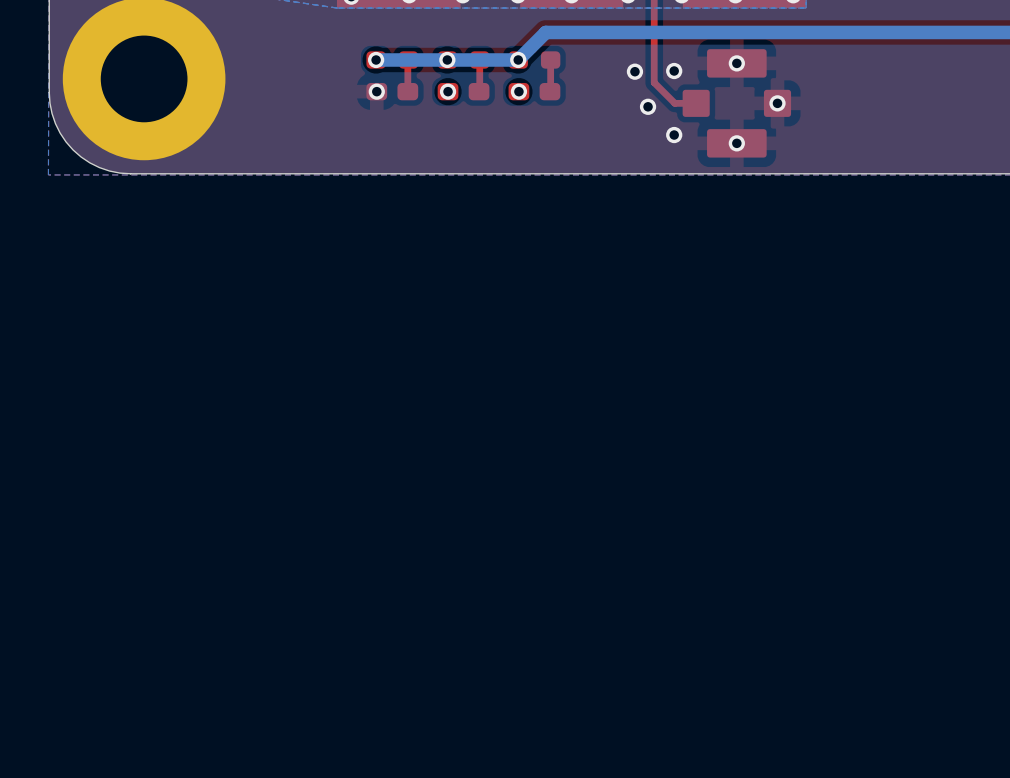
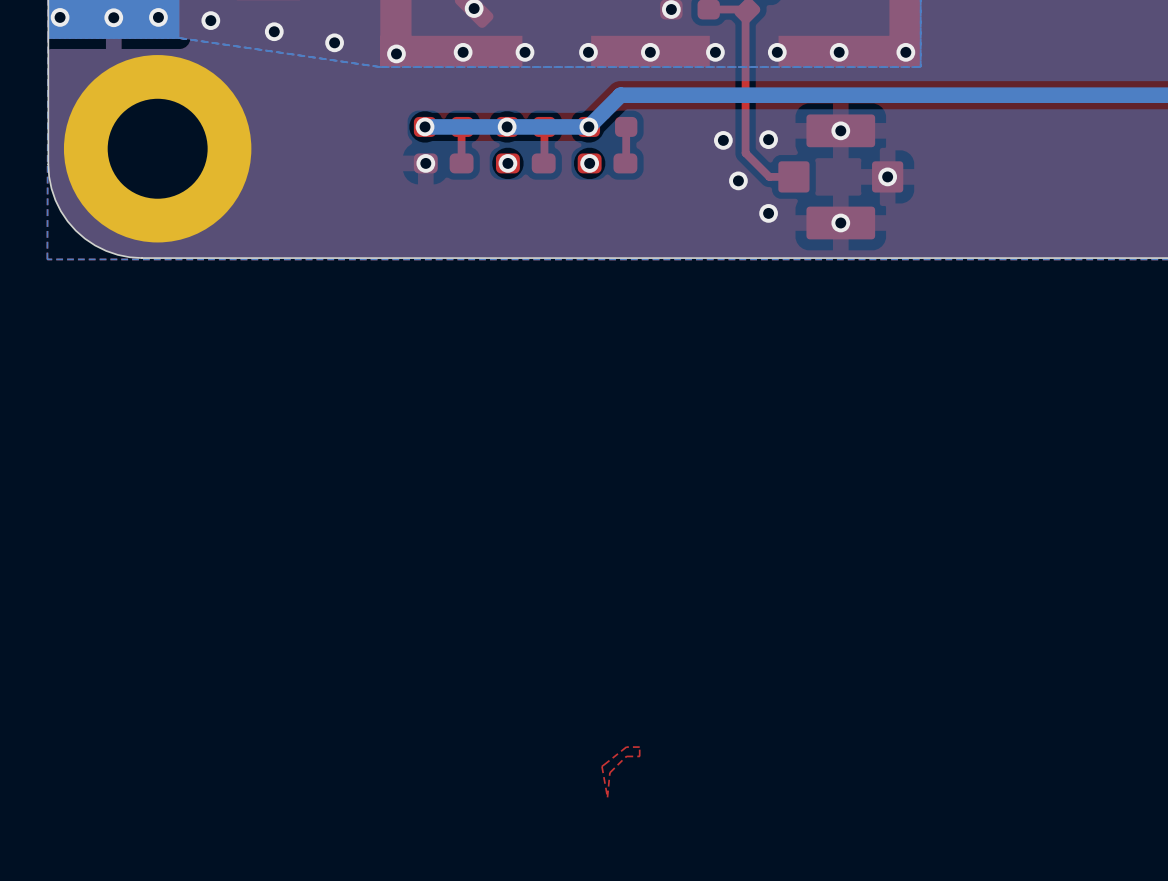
top zone outline: none -> (639, 747) (626, 747) (601, 766) (607, 797) (609, 772) (626, 756) (639, 756) (639, 747)

